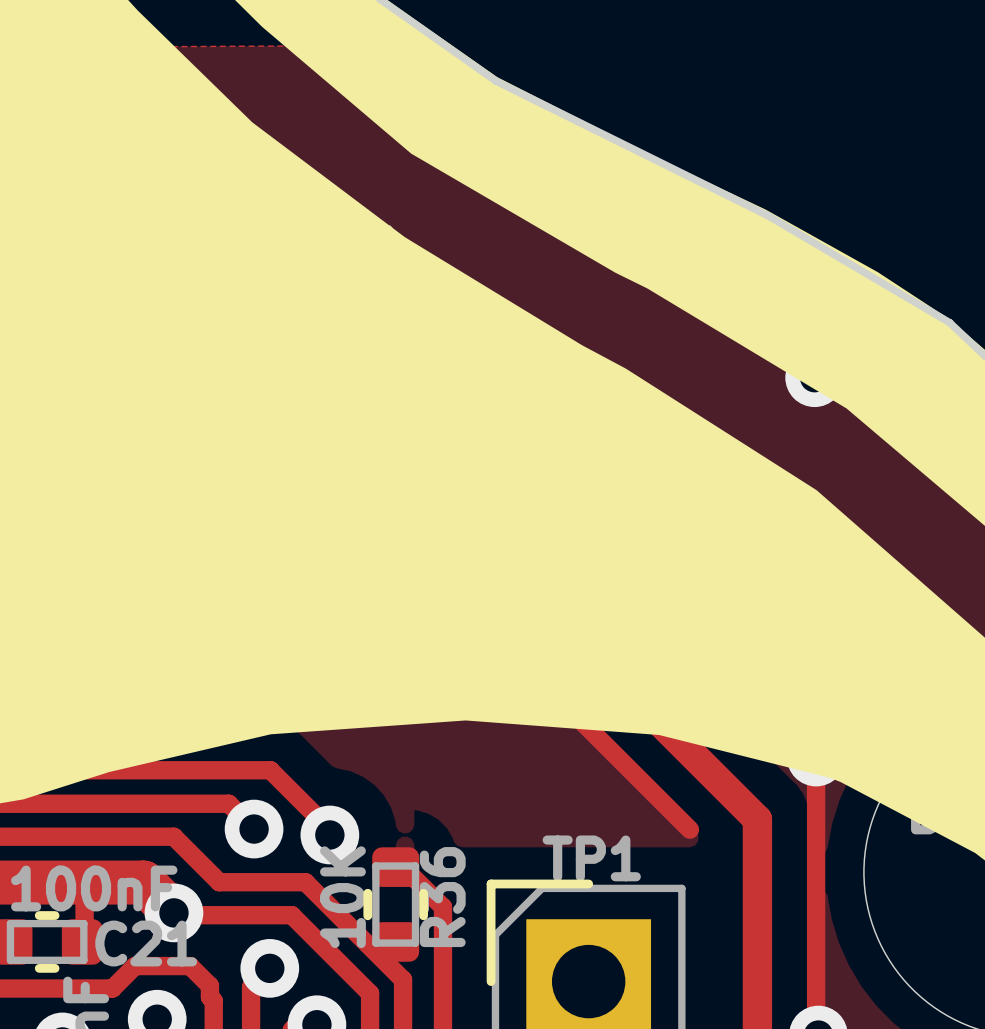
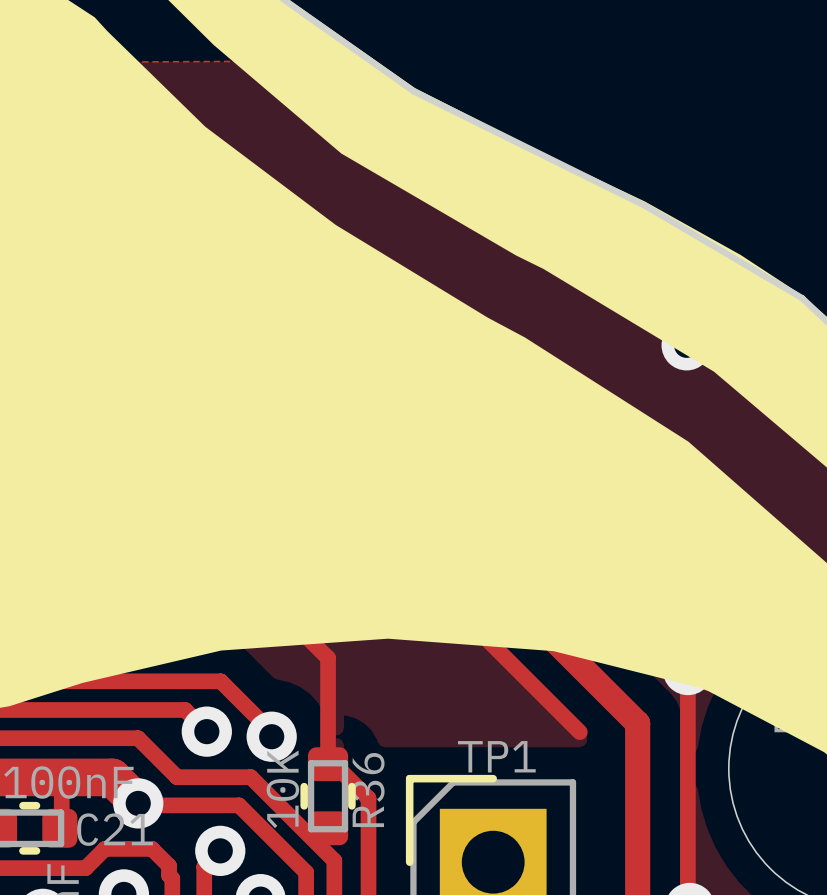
track: none -> (272, 602) (328, 658) (328, 764)

